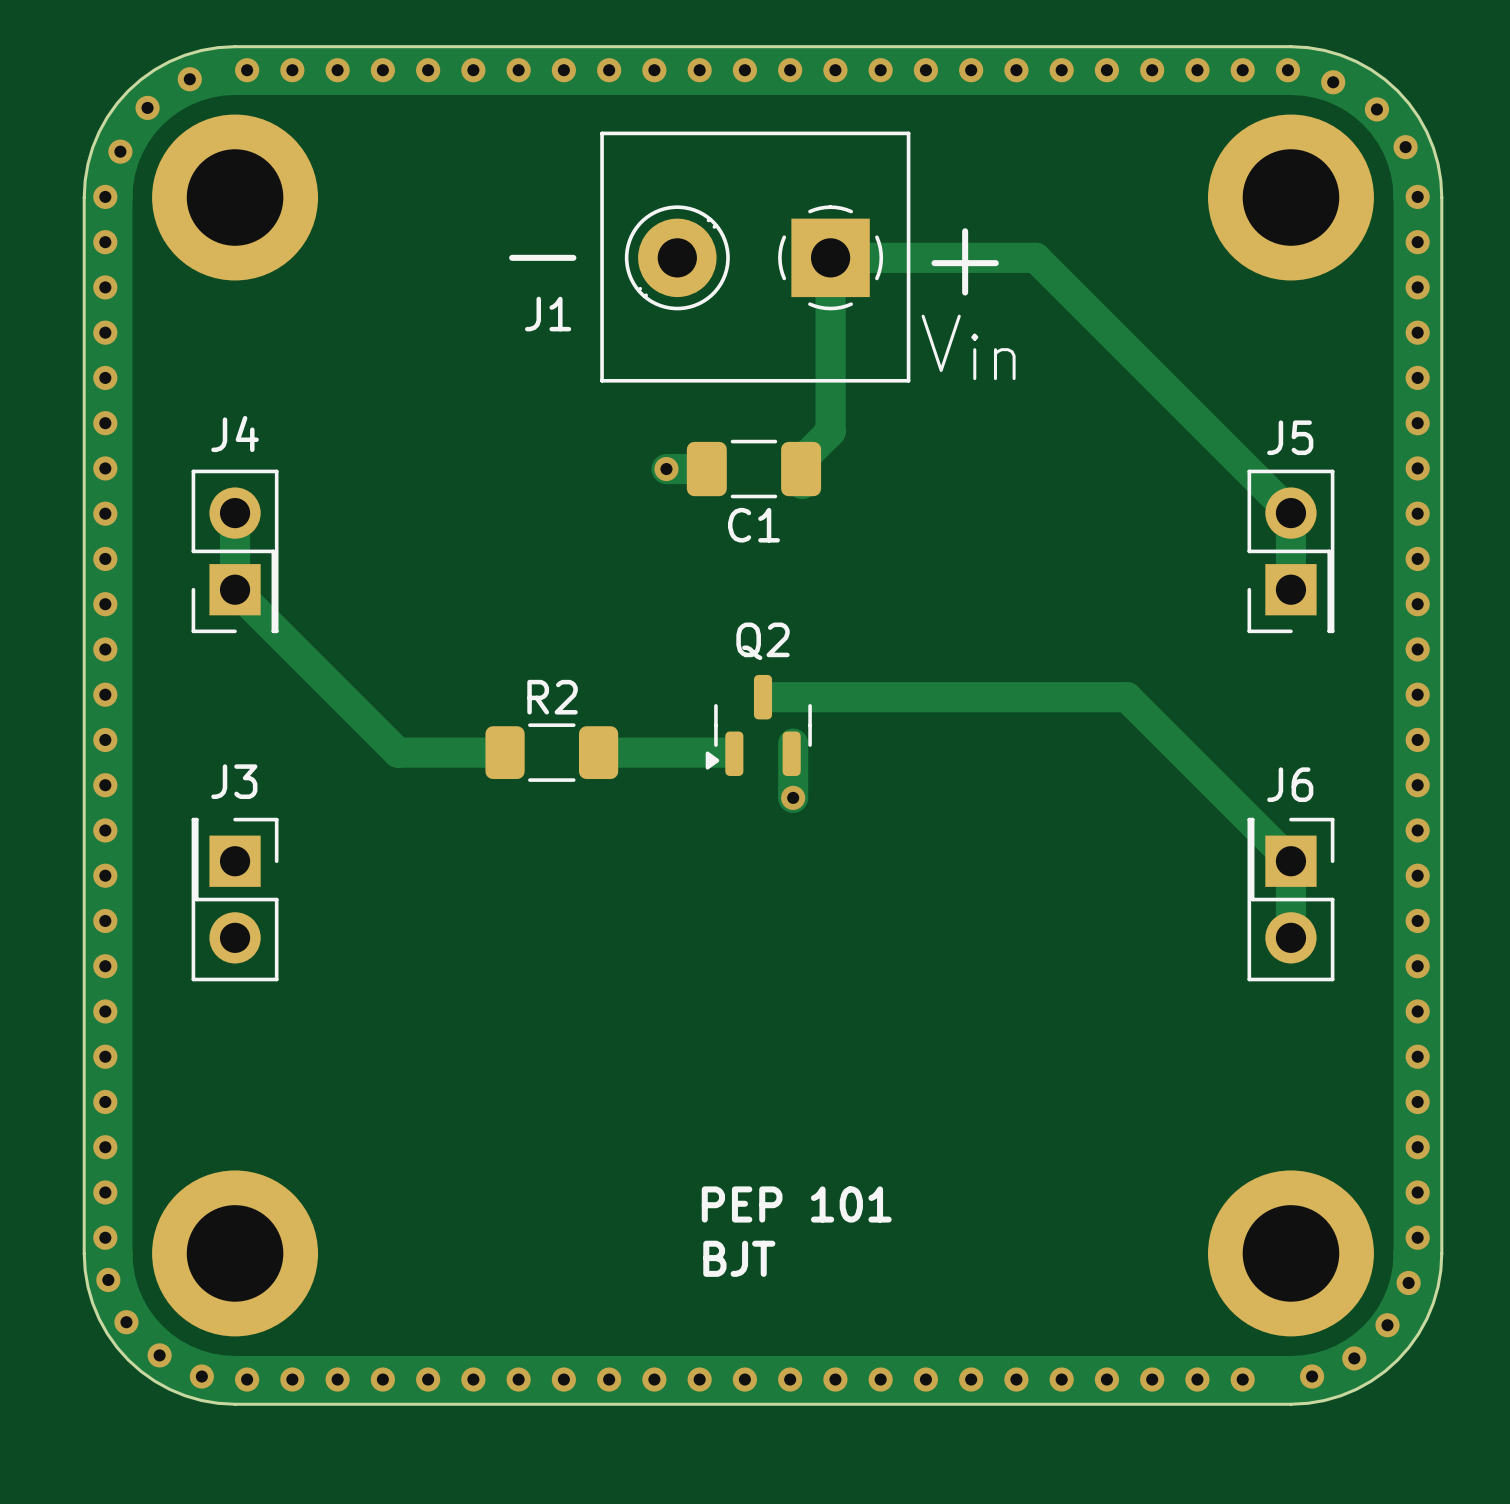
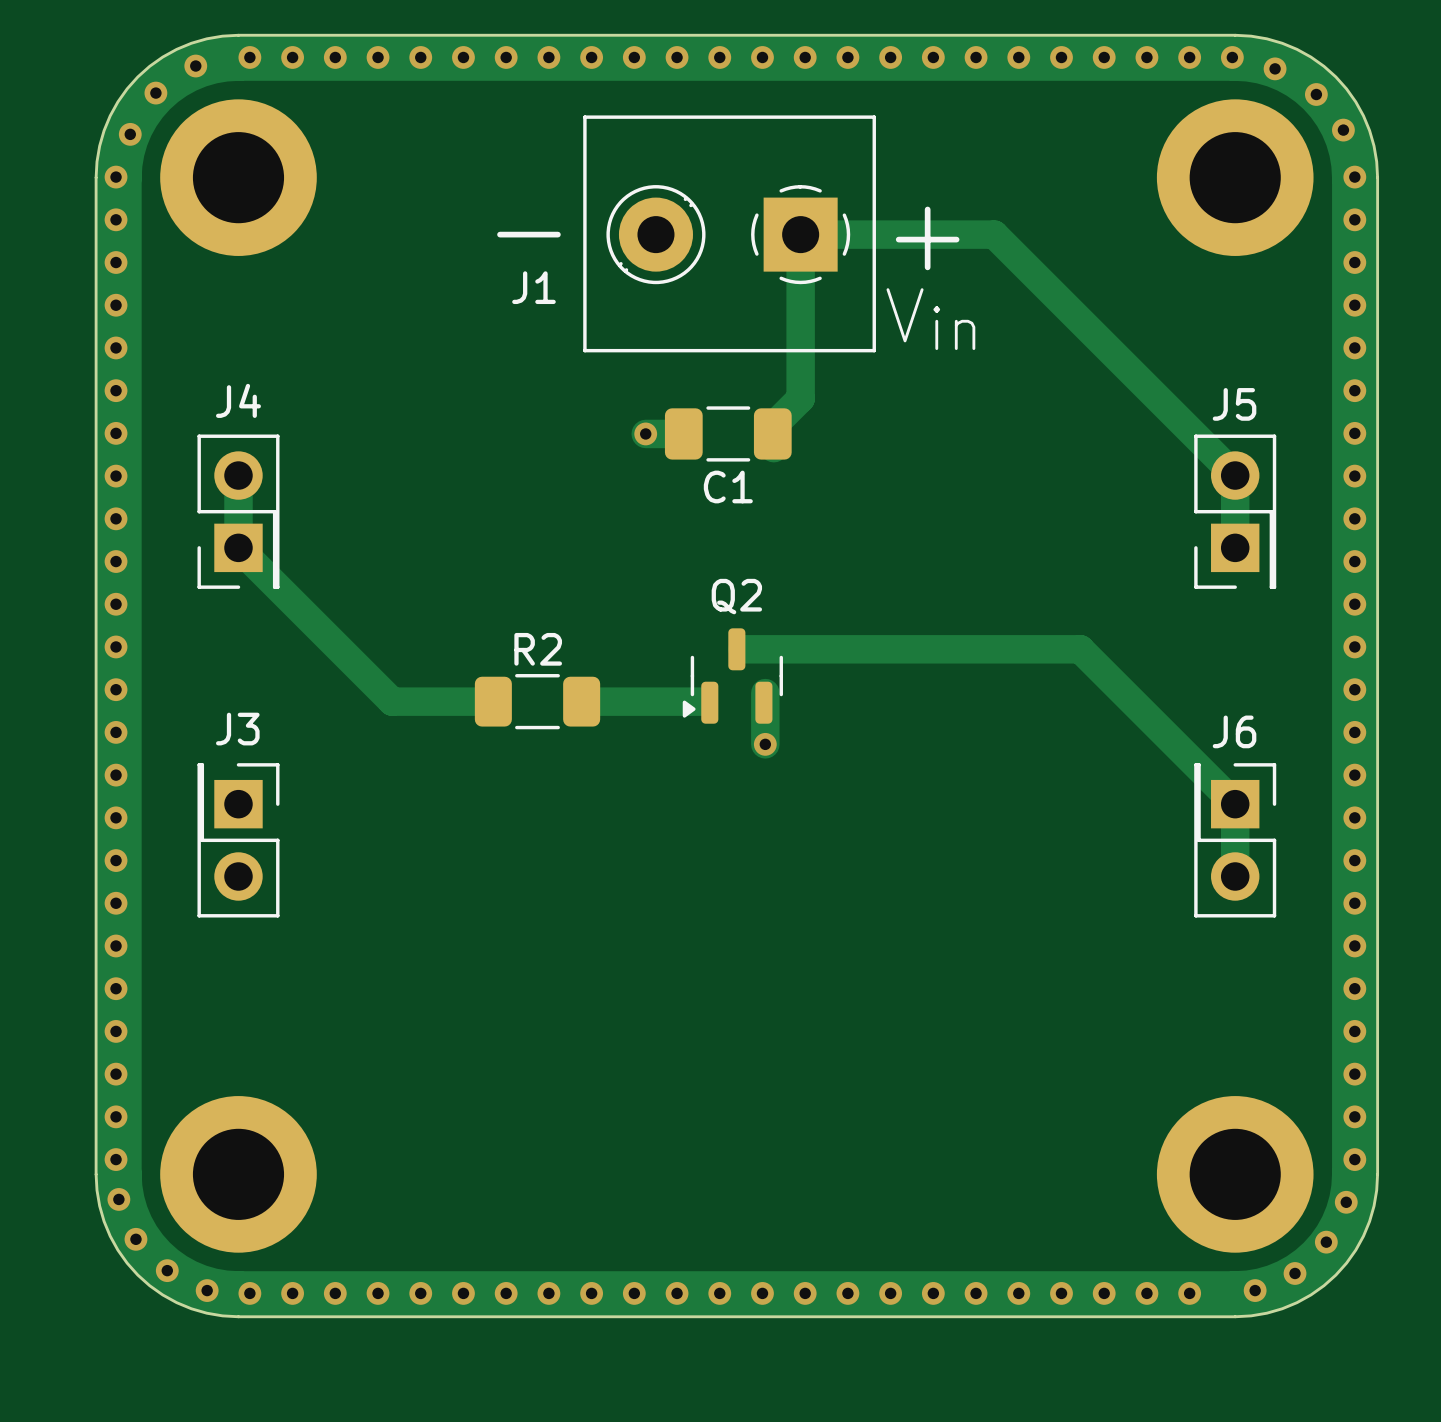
text: PEP 101 (796, 1204) -> none
text: BJT (739, 1258) -> none

